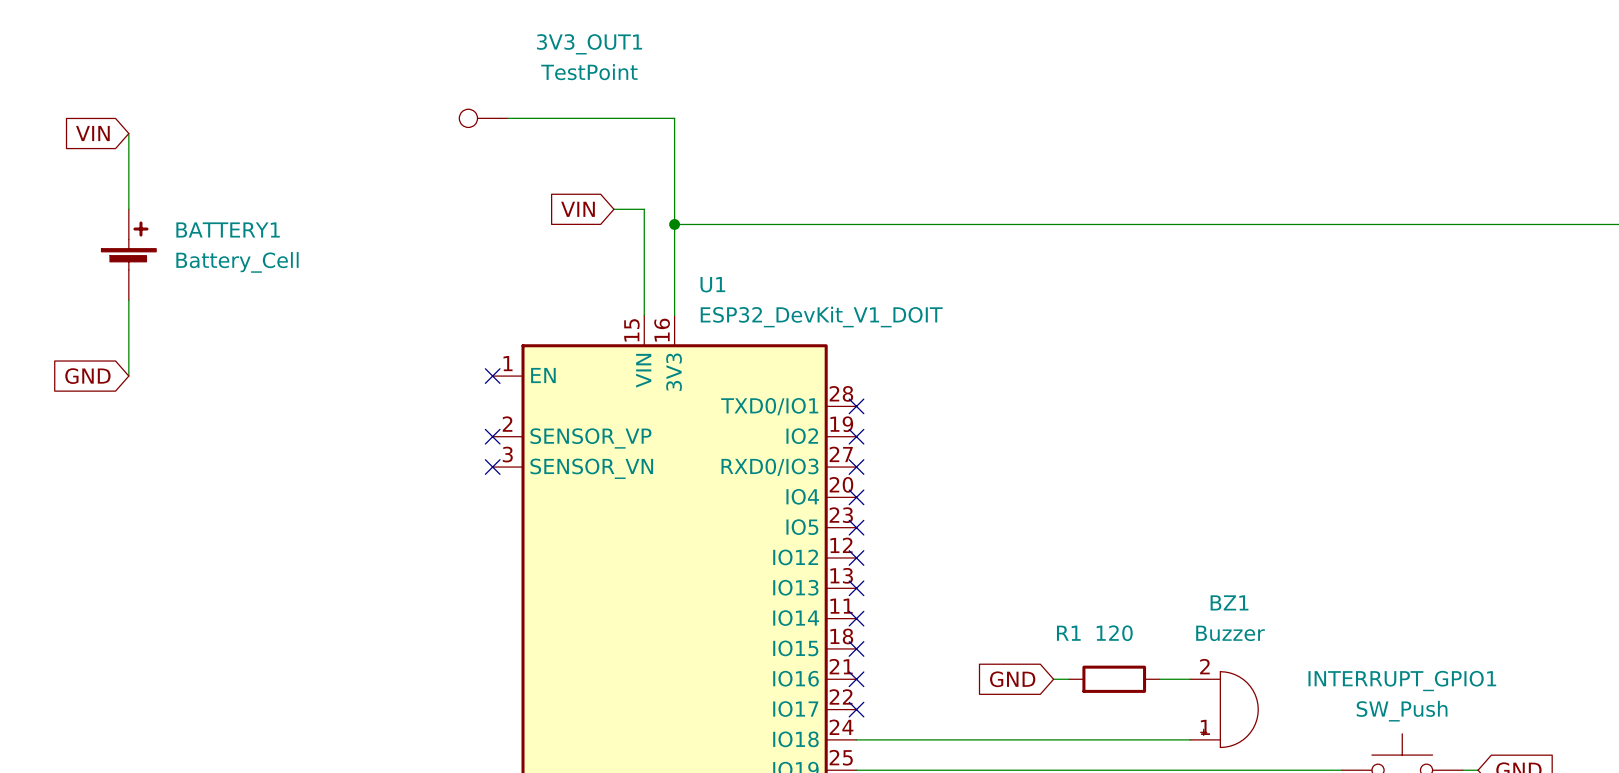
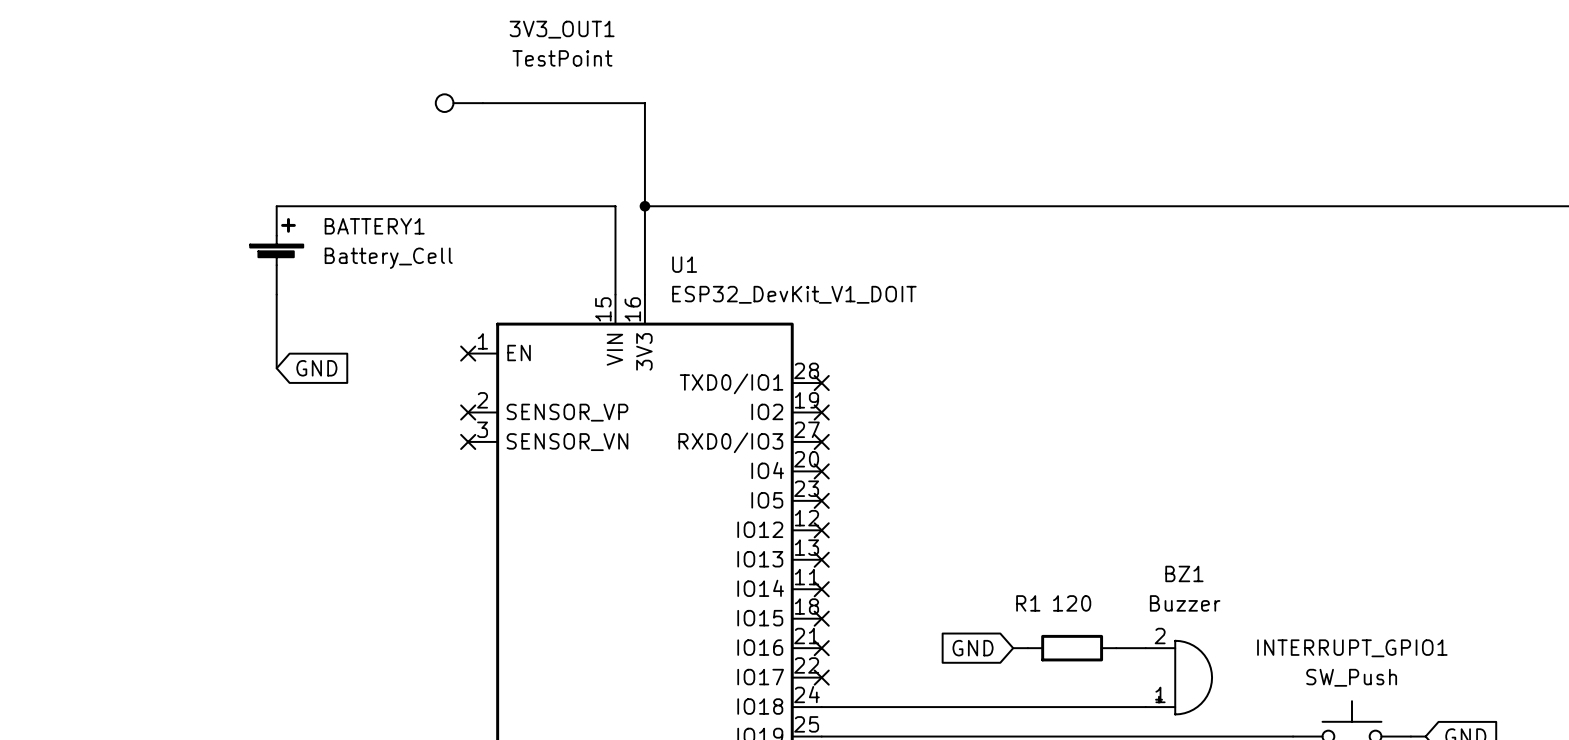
global label: VIN (92, 133) -> none
wire: (128, 133) (128, 209) -> none
global label: VIN (578, 209) -> none
wire: (613, 209) (644, 209) (644, 224) -> (276, 206) (615, 206)
BATTERY1 position: (128, 254) -> (276, 250)
wire: (128, 300) (128, 376) -> (276, 294) (276, 368)
global label rotation: 0° (87, 376) -> 180° (316, 368)
global label position: GND (87, 376) -> GND (316, 368)

